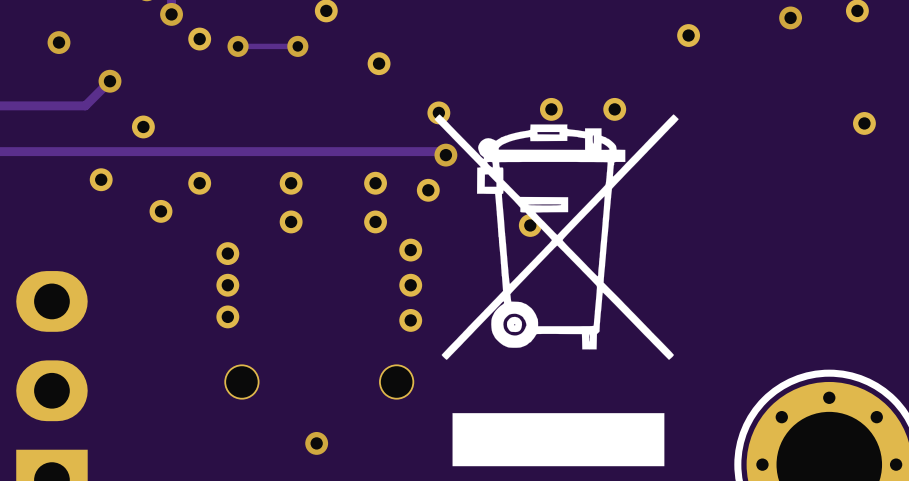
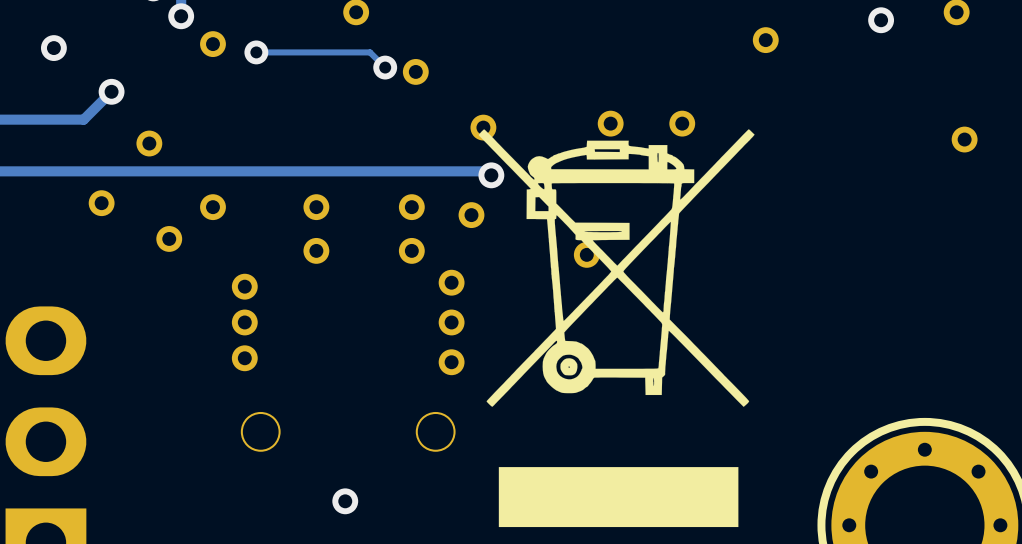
track: none -> (323, 52) (370, 52) (385, 67)
via position: (297, 46) -> (385, 67)

